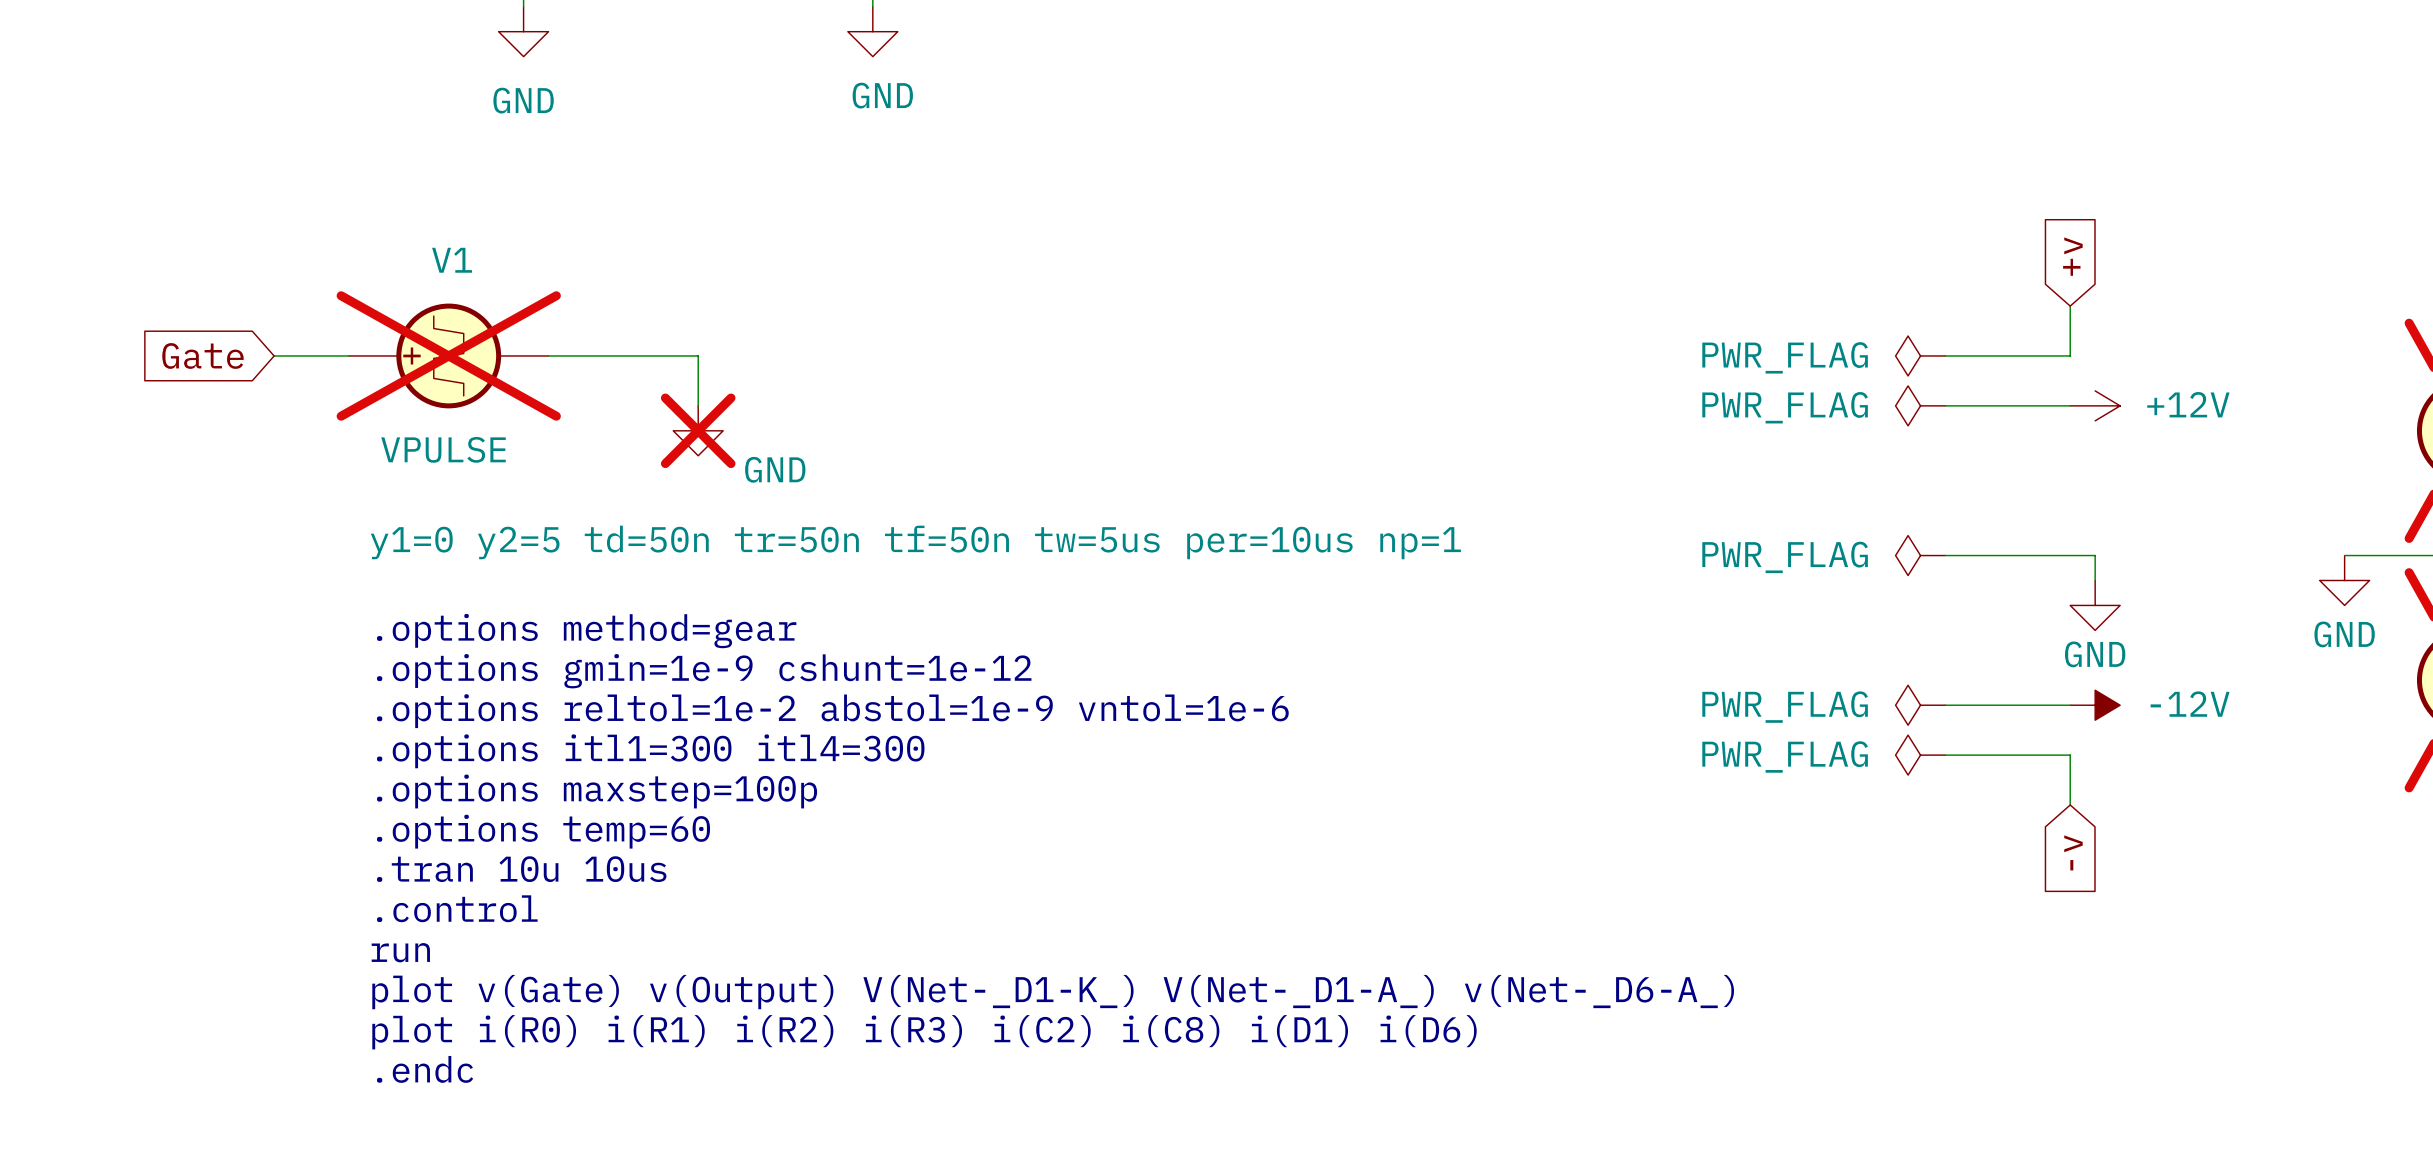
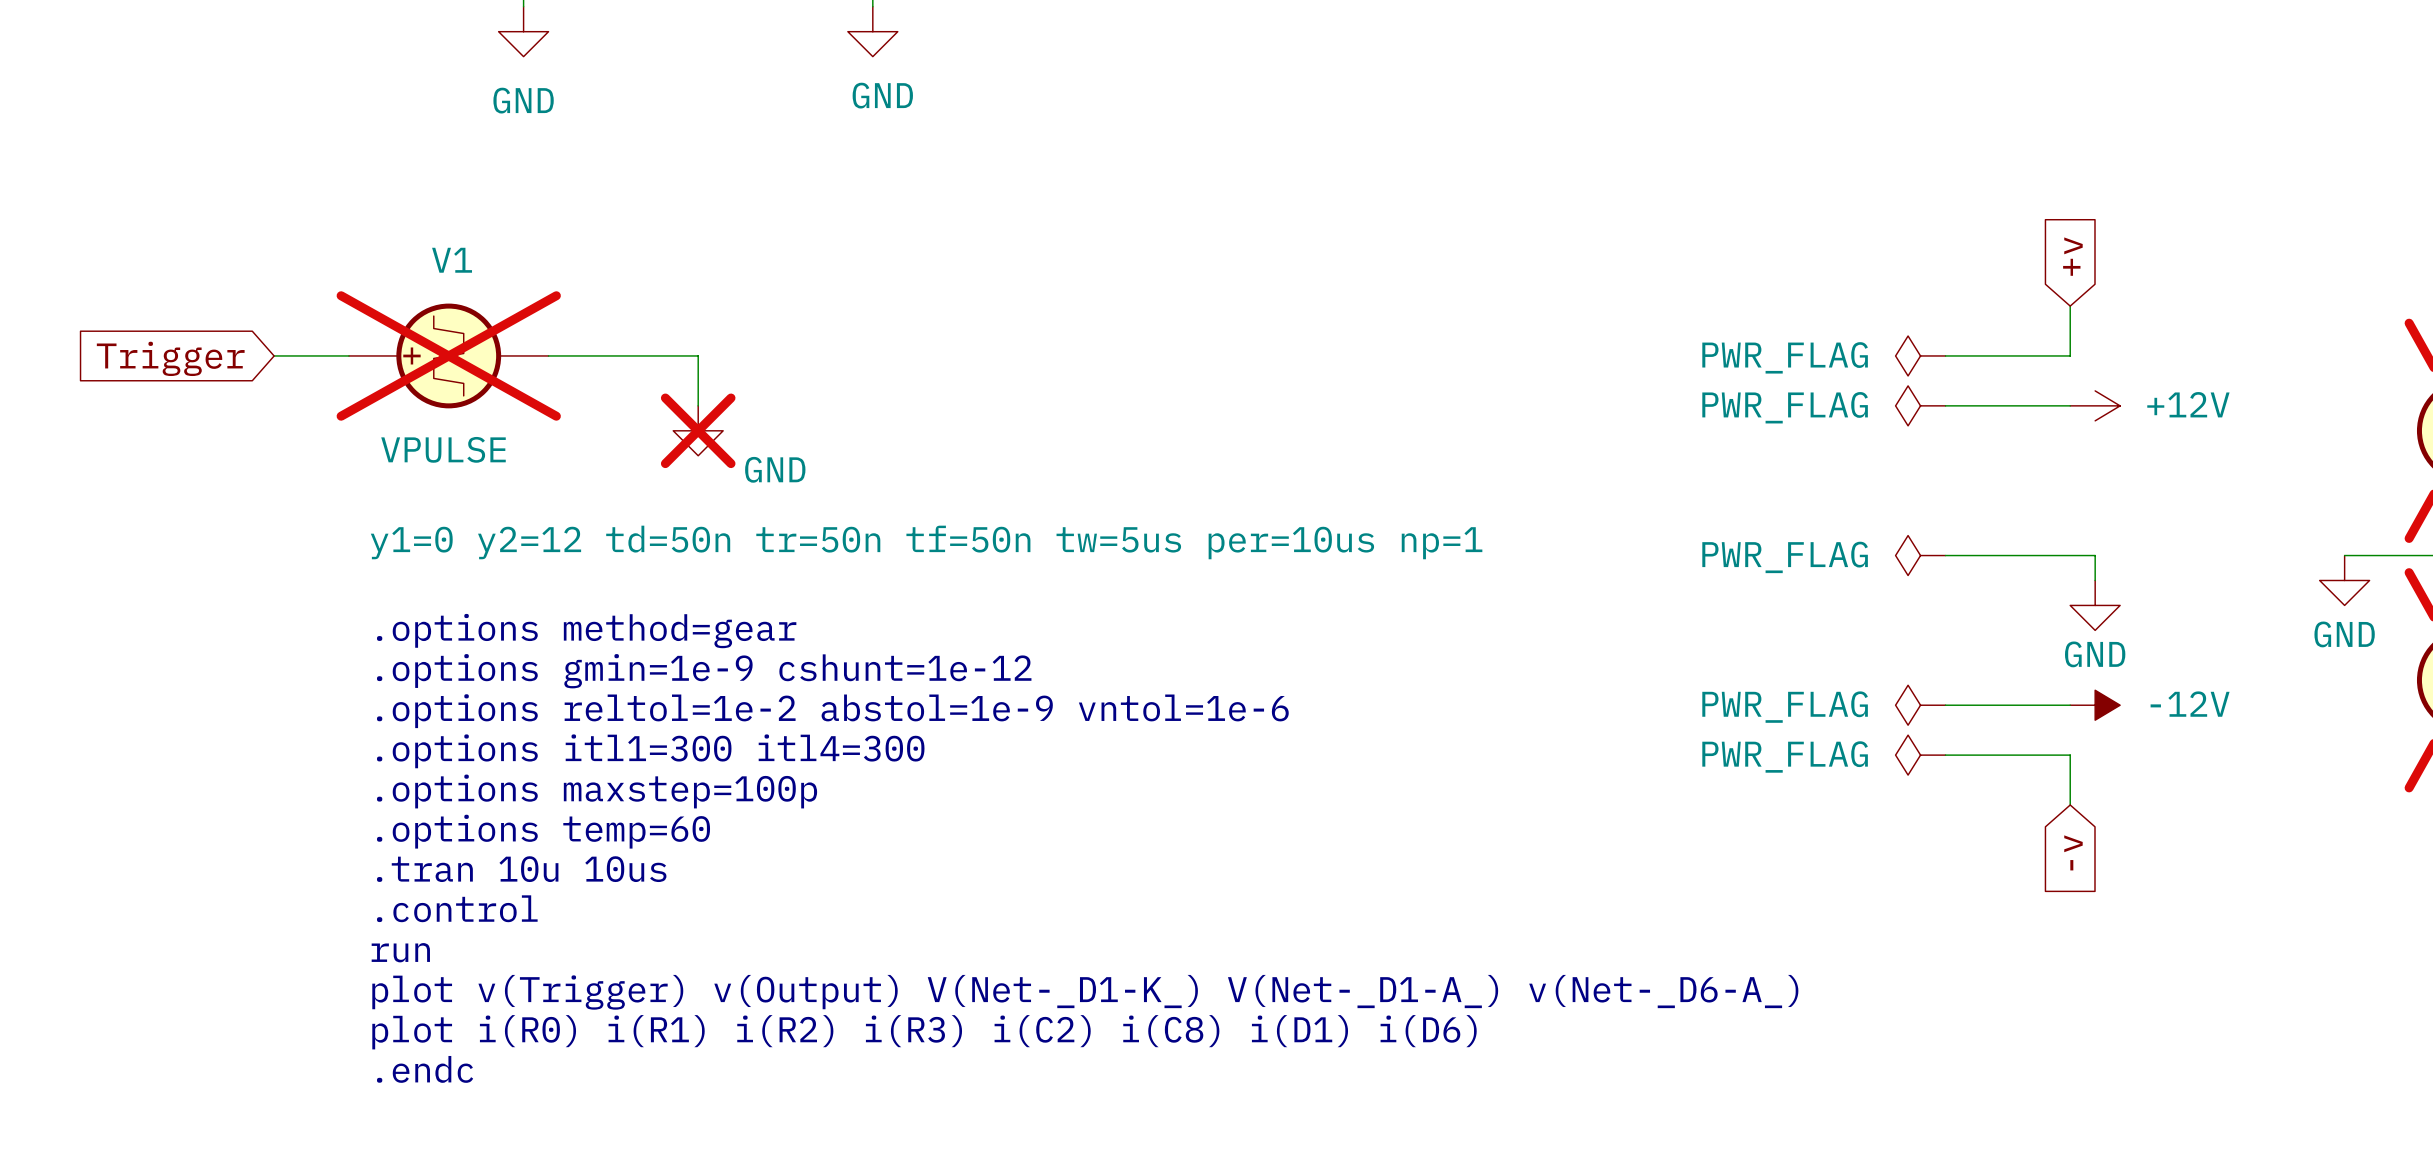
global label: Gate (202, 355) -> Trigger (170, 358)
V1 text: y1=0 y2=5 td=50n tr=50n tf=50n tw=5us per=10us np=1 (915, 542) -> y1=0 y2=12 td=50n tr=50n tf=50n tw=5us per=10us np=1 (926, 542)
text: plot v(Gate) v(Output) V(Net-_D1-K_) V(Net-_D1-A_) v(Net-_D6-A_) (1053, 992) -> plot v(Trigger) v(Output) V(Net-_D1-K_) V(Net-_D1-A_) v(Net-_D6-A_) (1085, 992)

